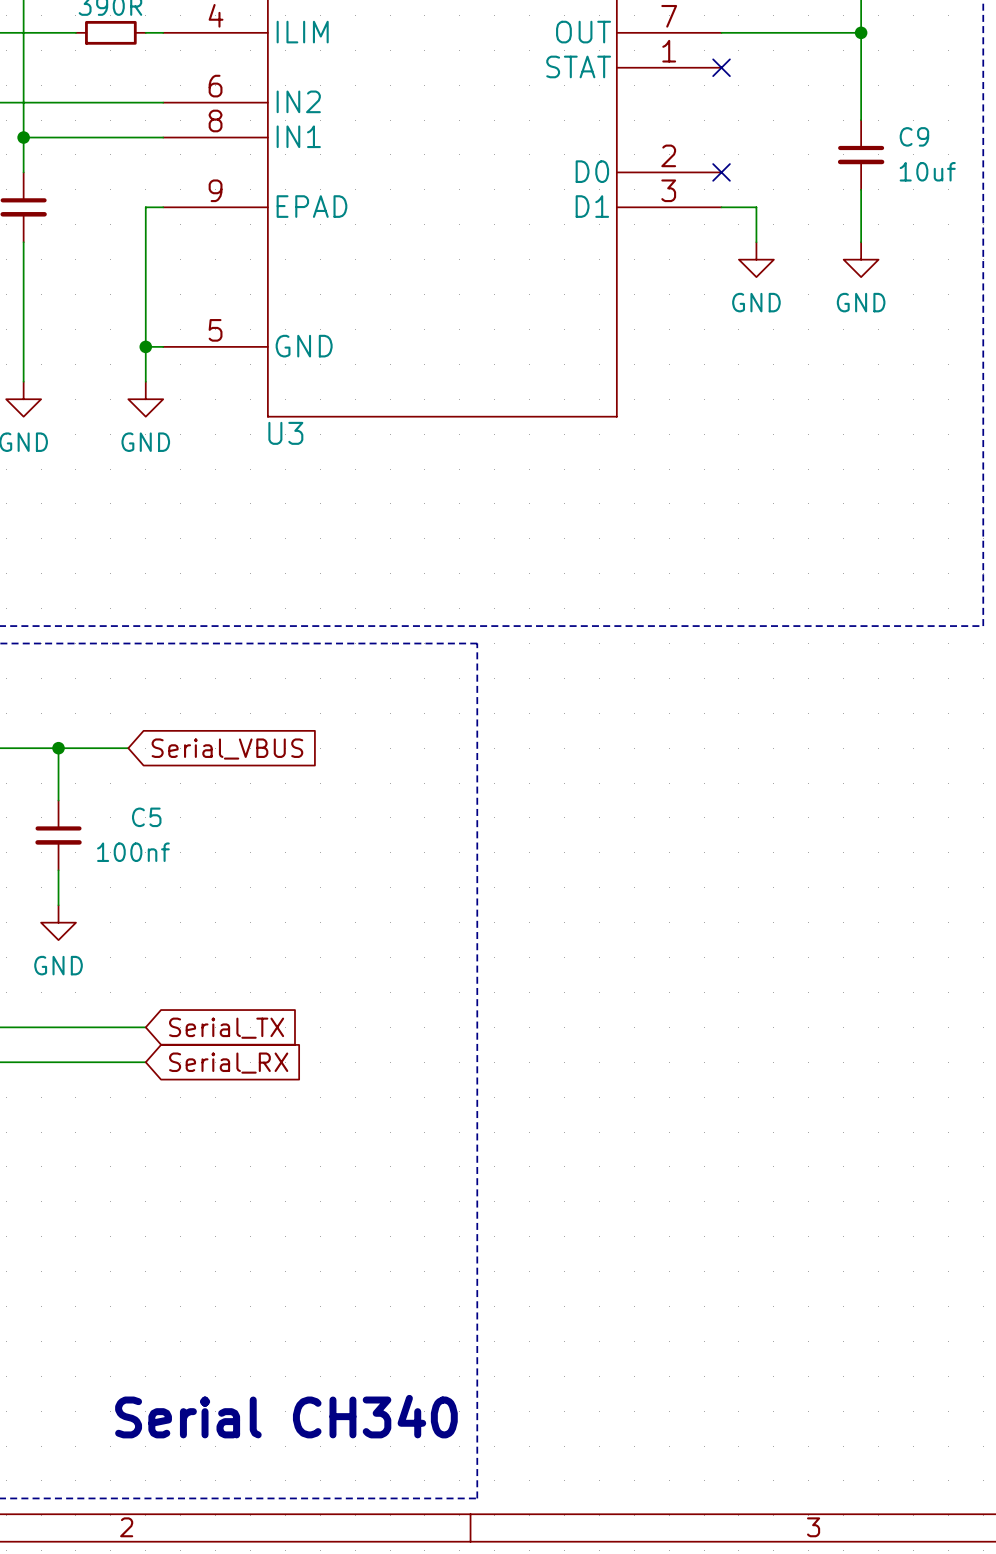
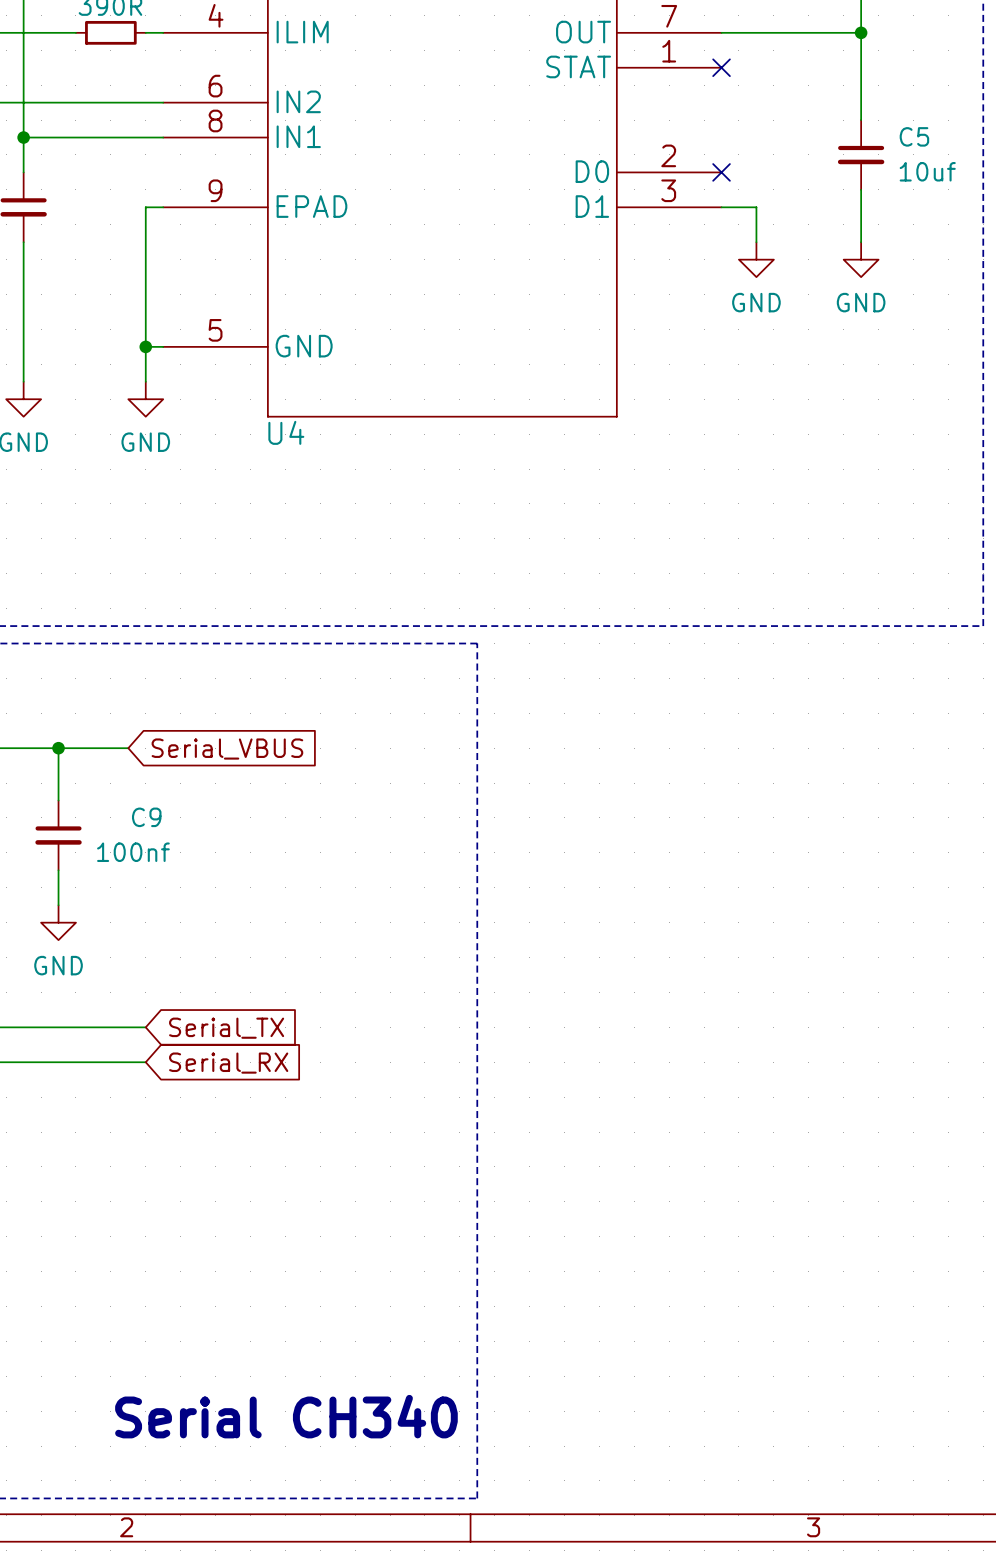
C9 name: C9 (914, 136) -> C5 (914, 136)
U3 name: U3 (285, 433) -> U4 (286, 432)
C5 name: C5 (146, 817) -> C9 (146, 817)

